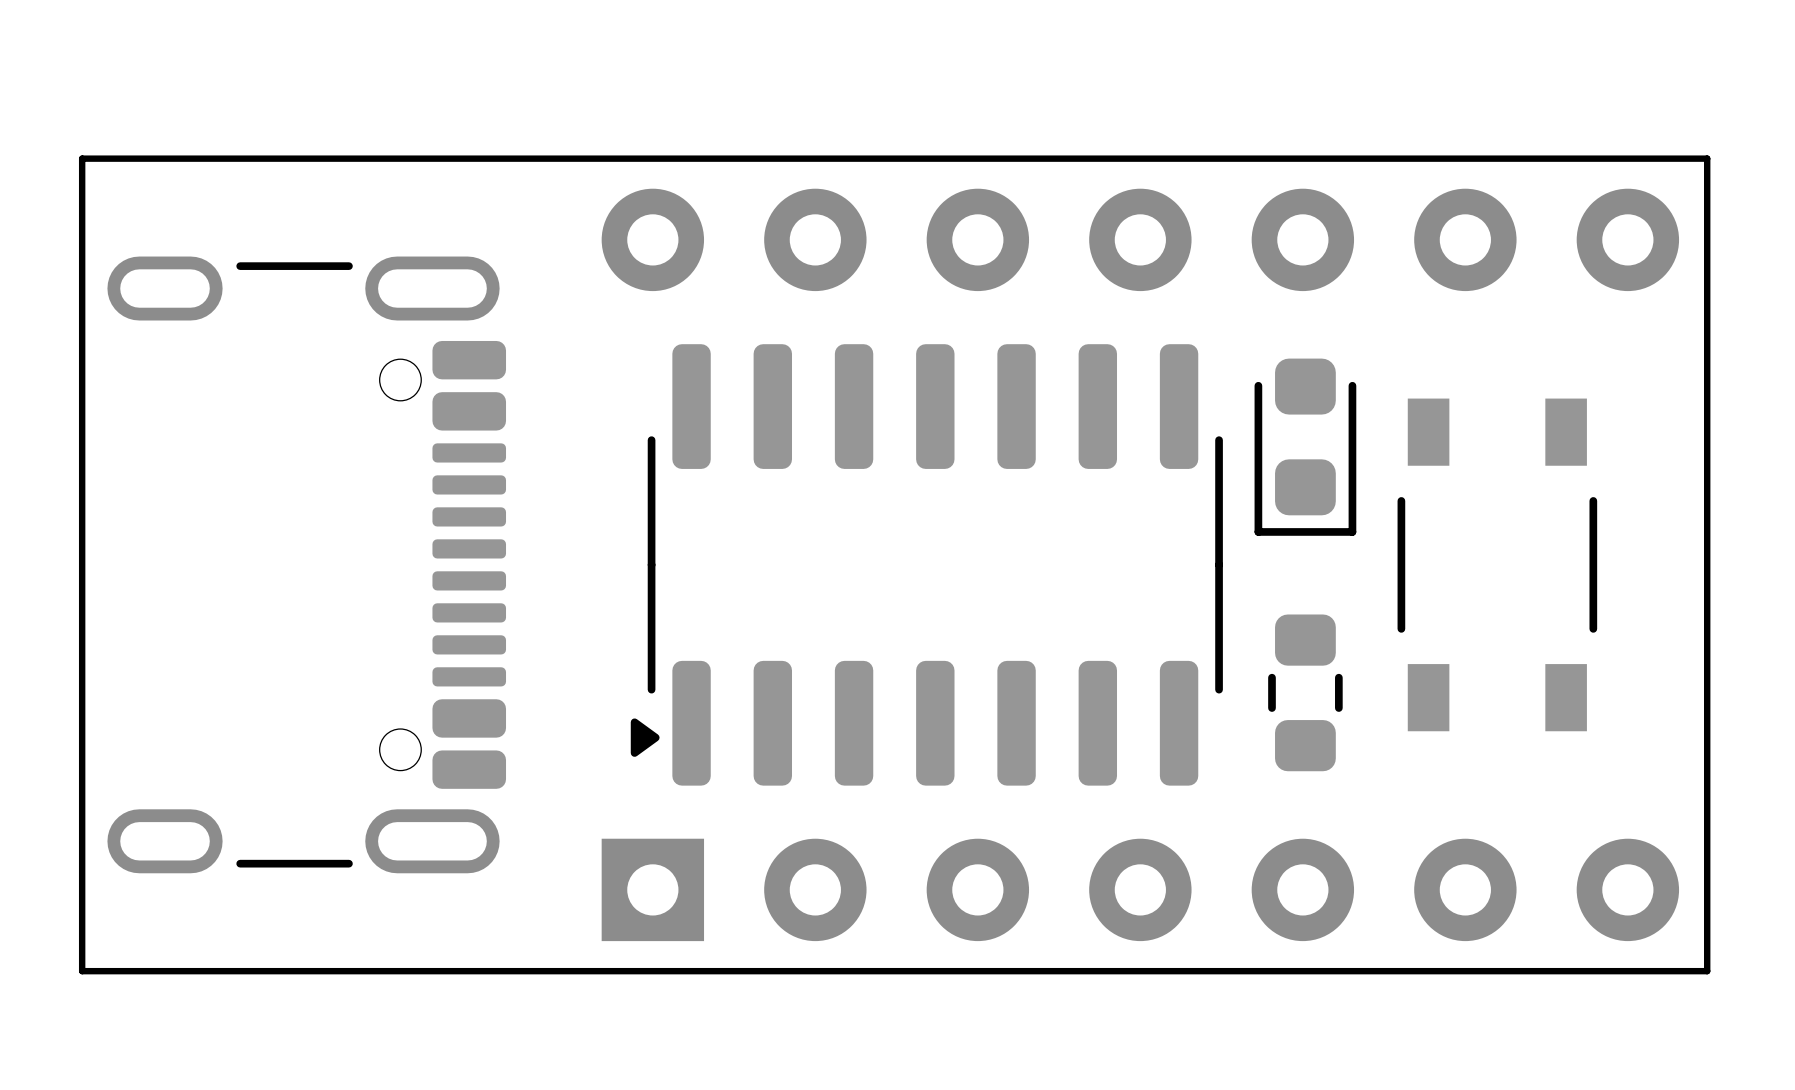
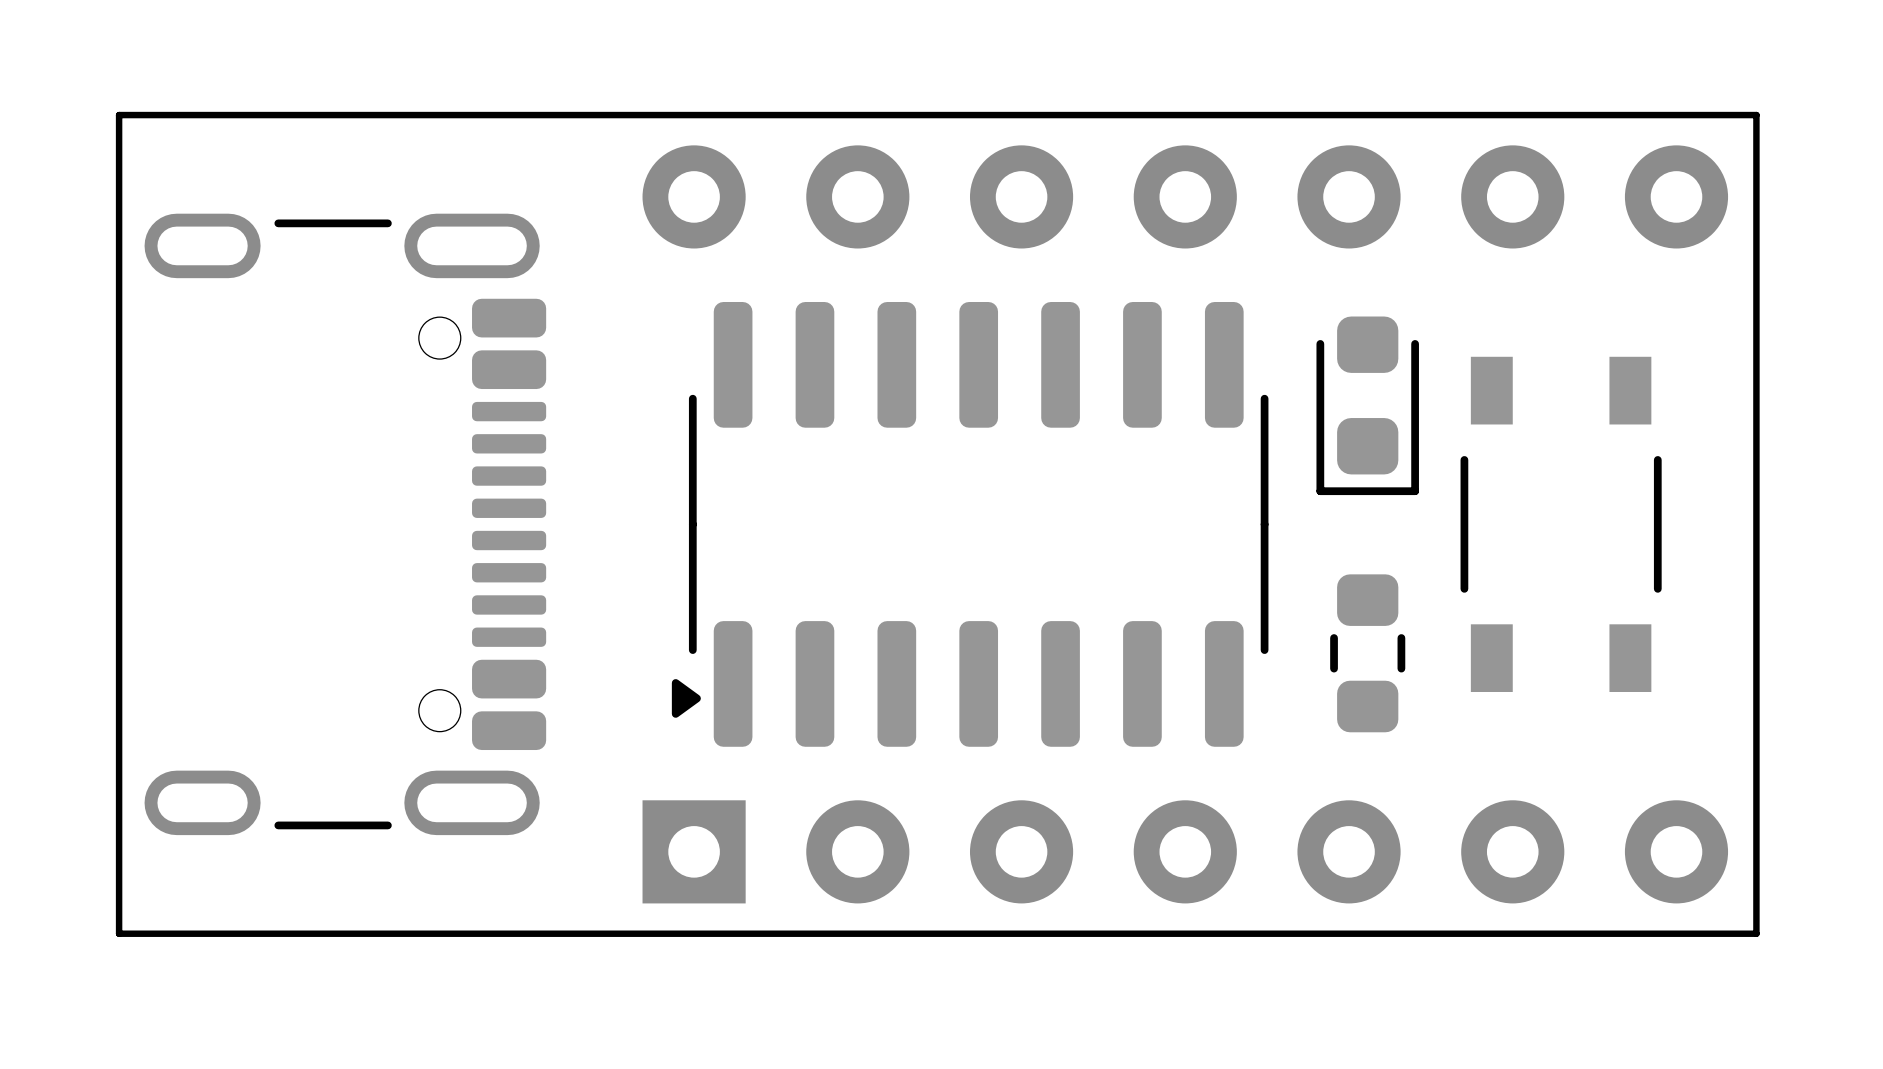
part position: (1305, 447) -> (1367, 405)
part position: (1497, 564) -> (1561, 524)
part position: (1305, 692) -> (1367, 653)

